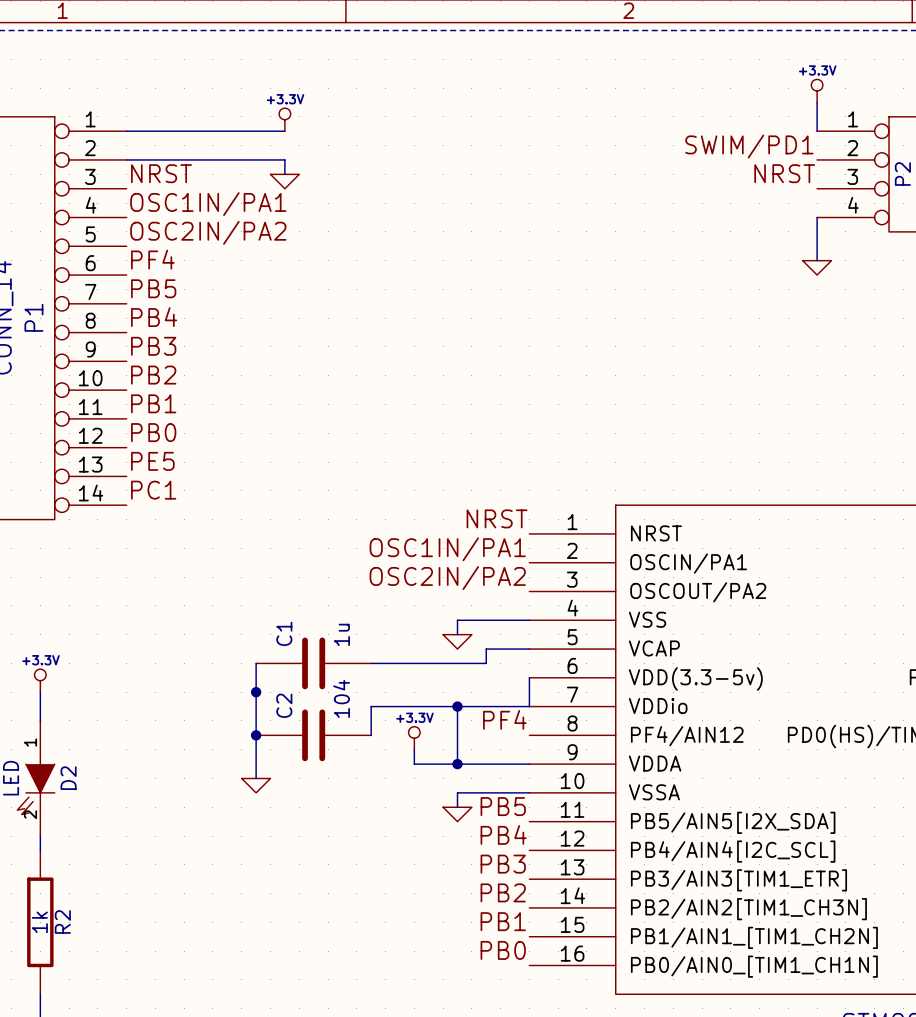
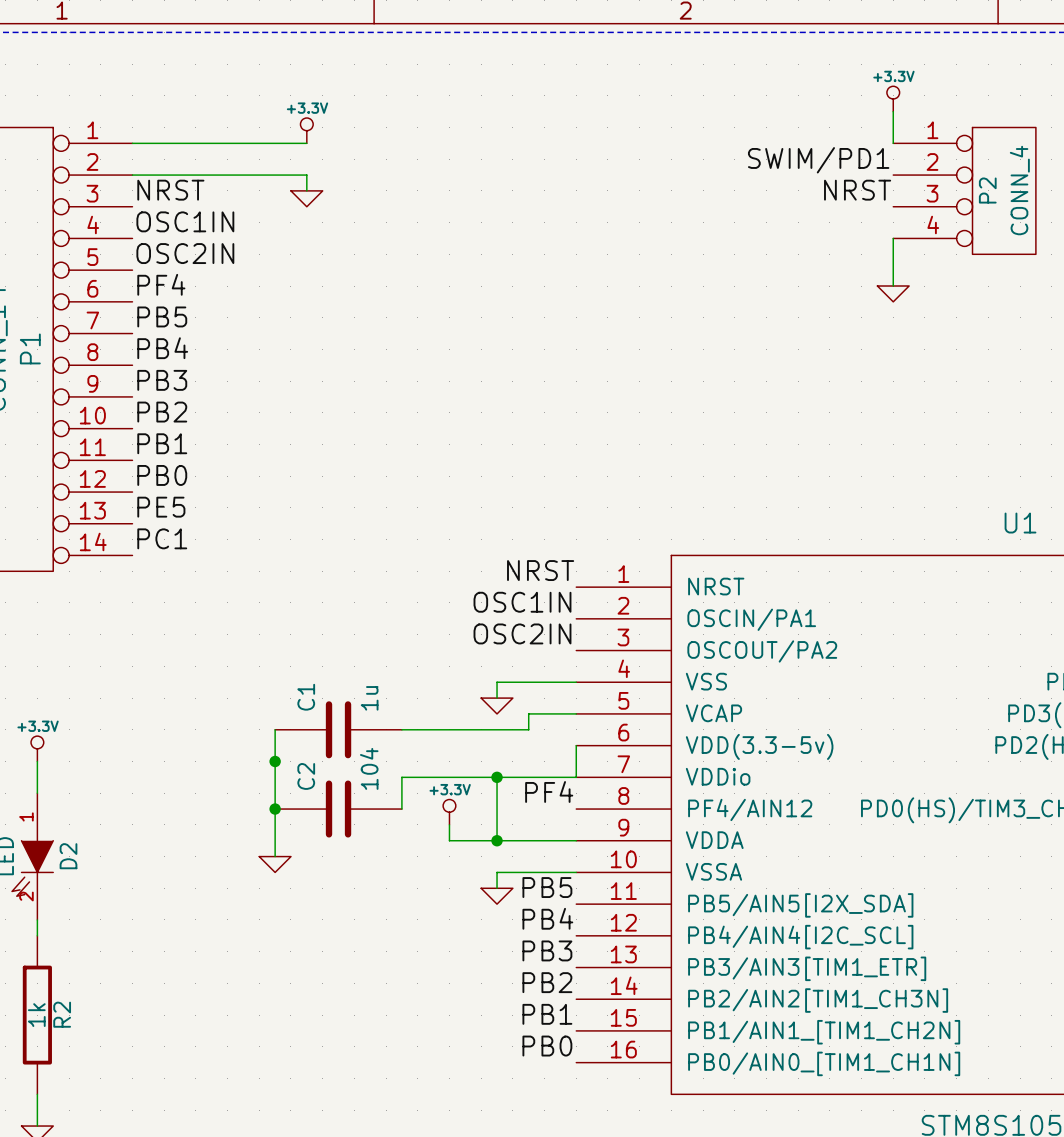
label: OSC1IN/PA1 (208, 204) -> OSC1IN (185, 221)
label: OSC2IN/PA2 (208, 232) -> OSC2IN (185, 253)
label: OSC1IN/PA1 (447, 549) -> OSC1IN (522, 602)
label: OSC2IN/PA2 (447, 578) -> OSC2IN (522, 633)

